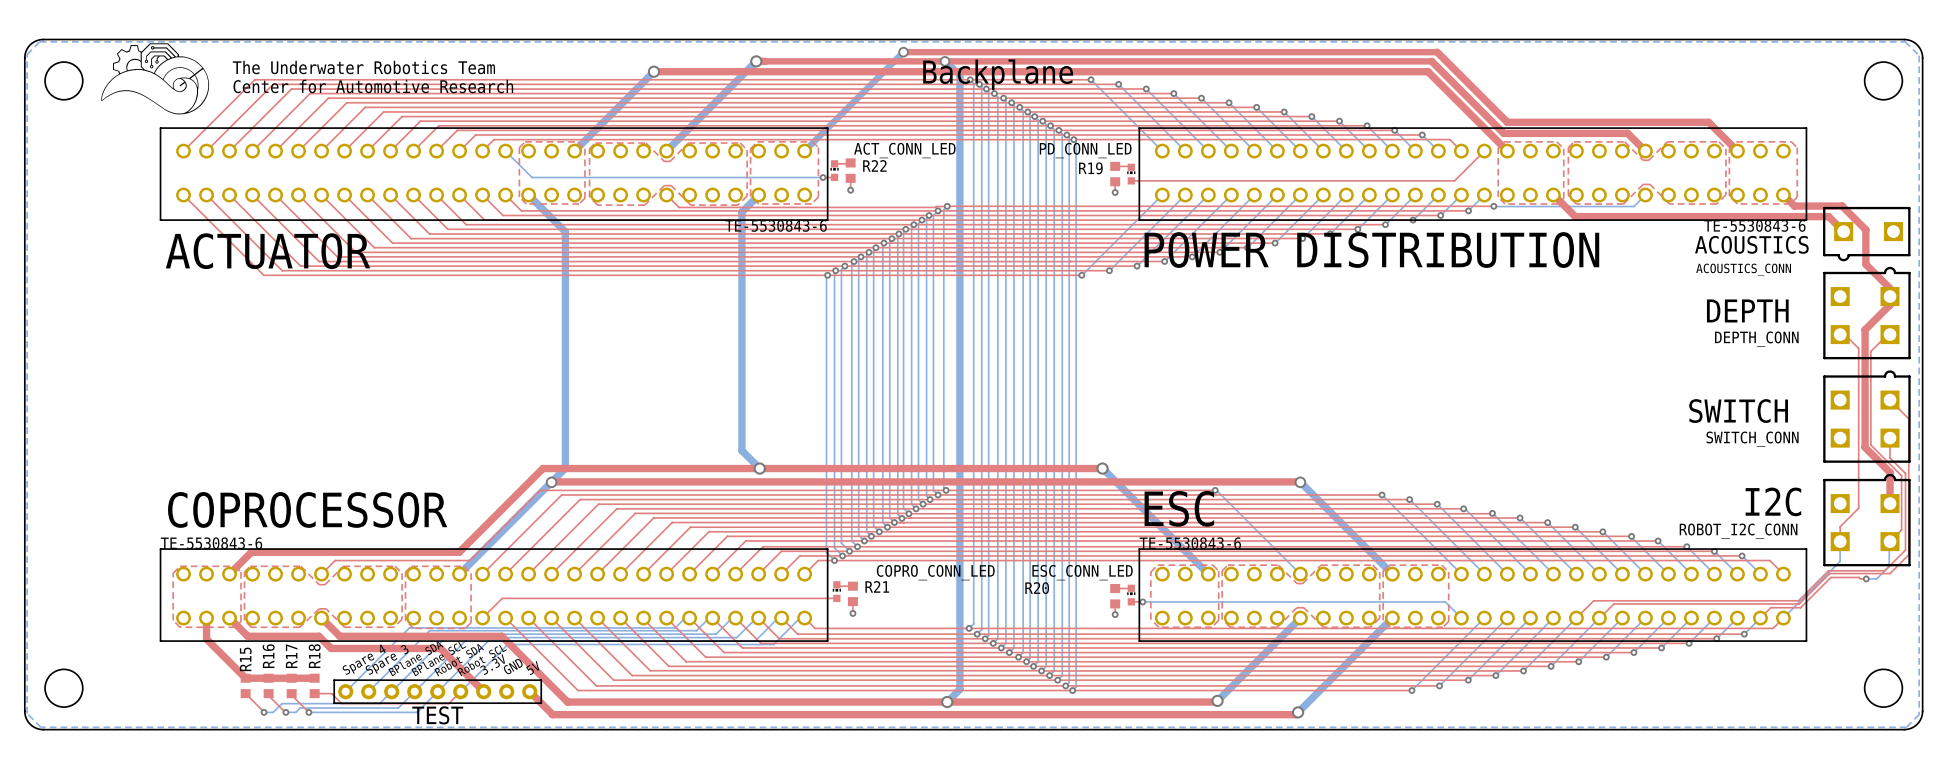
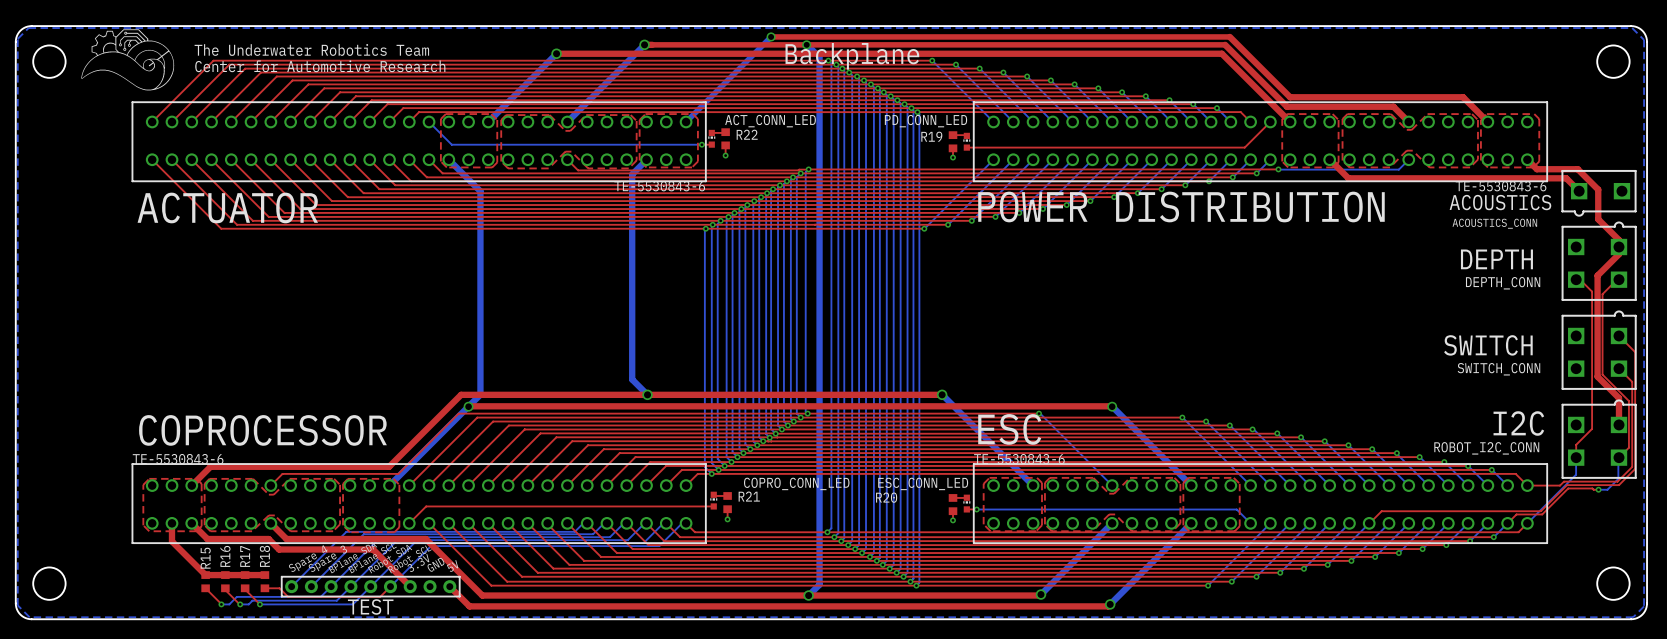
top track: (1890, 438) (1890, 457) (1905, 473) (1905, 550) (1884, 570) (1828, 570) (1798, 600) (1593, 600) (1576, 618) -> (1619, 368) (1632, 381) (1632, 467) (1617, 481) (1563, 481) (1560, 485) (1527, 485)

